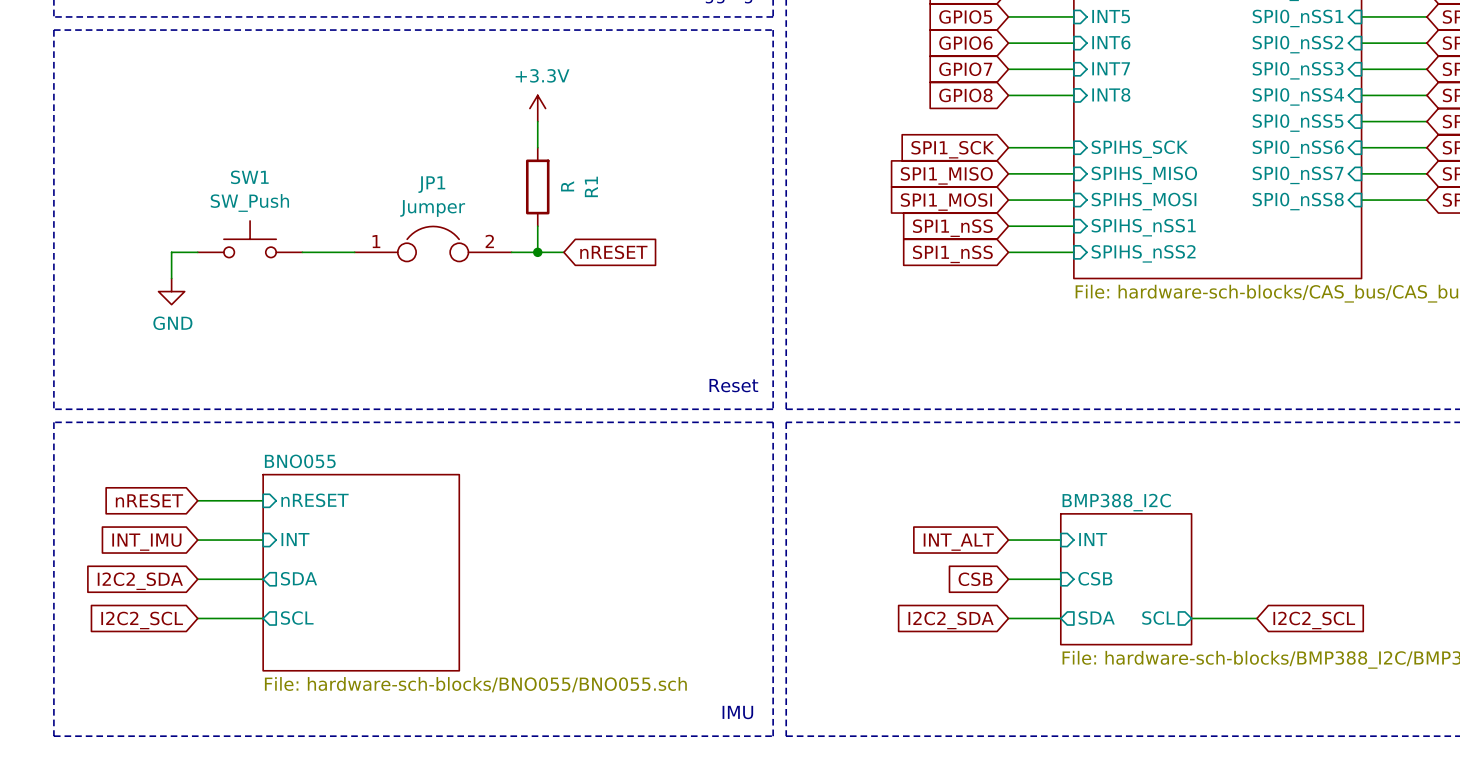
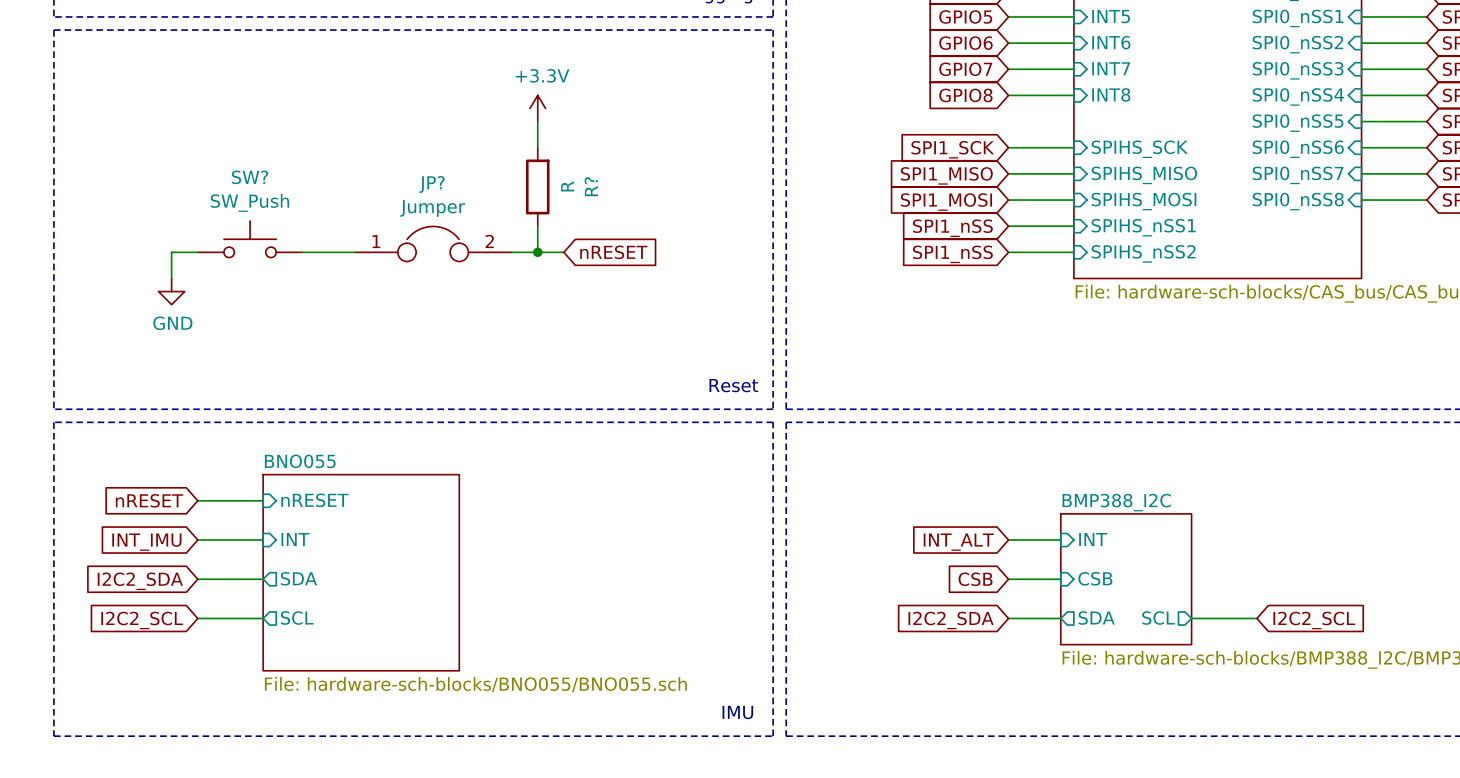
SW1 name: SW1 (249, 177) -> SW? (250, 177)
JP1 name: JP1 (431, 184) -> JP? (432, 184)
R1 name: R1 (591, 186) -> R? (591, 186)

